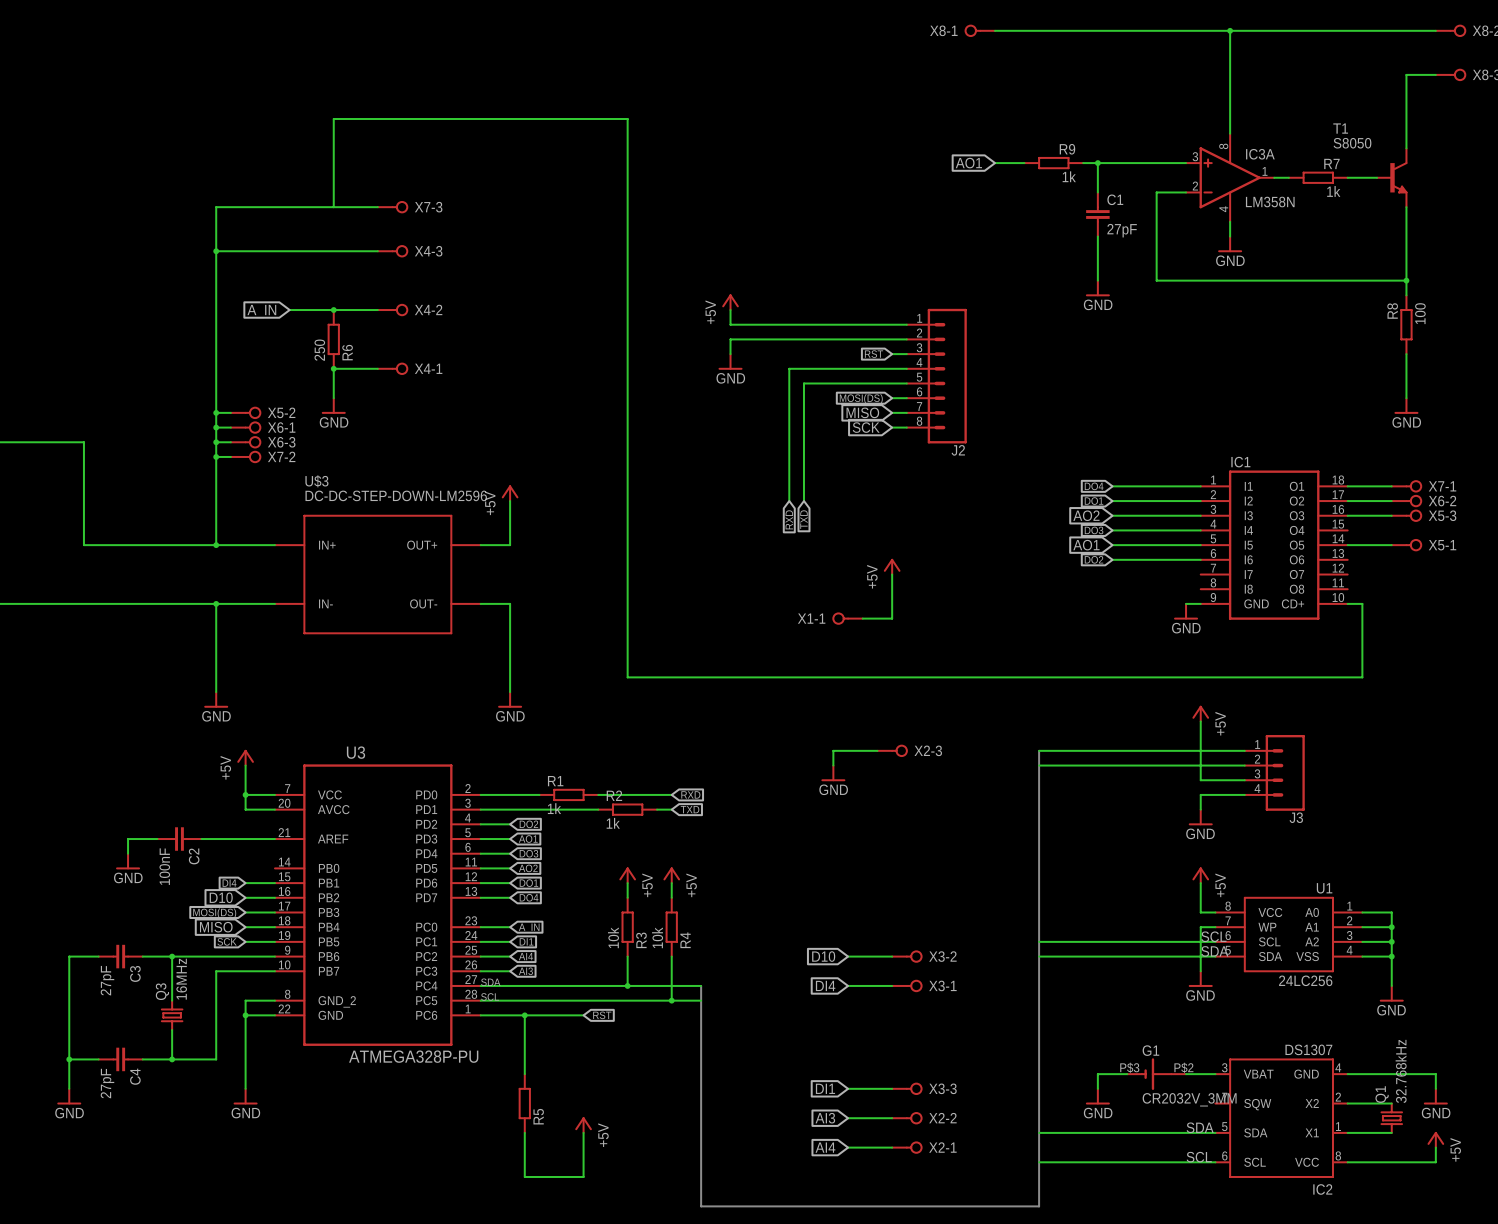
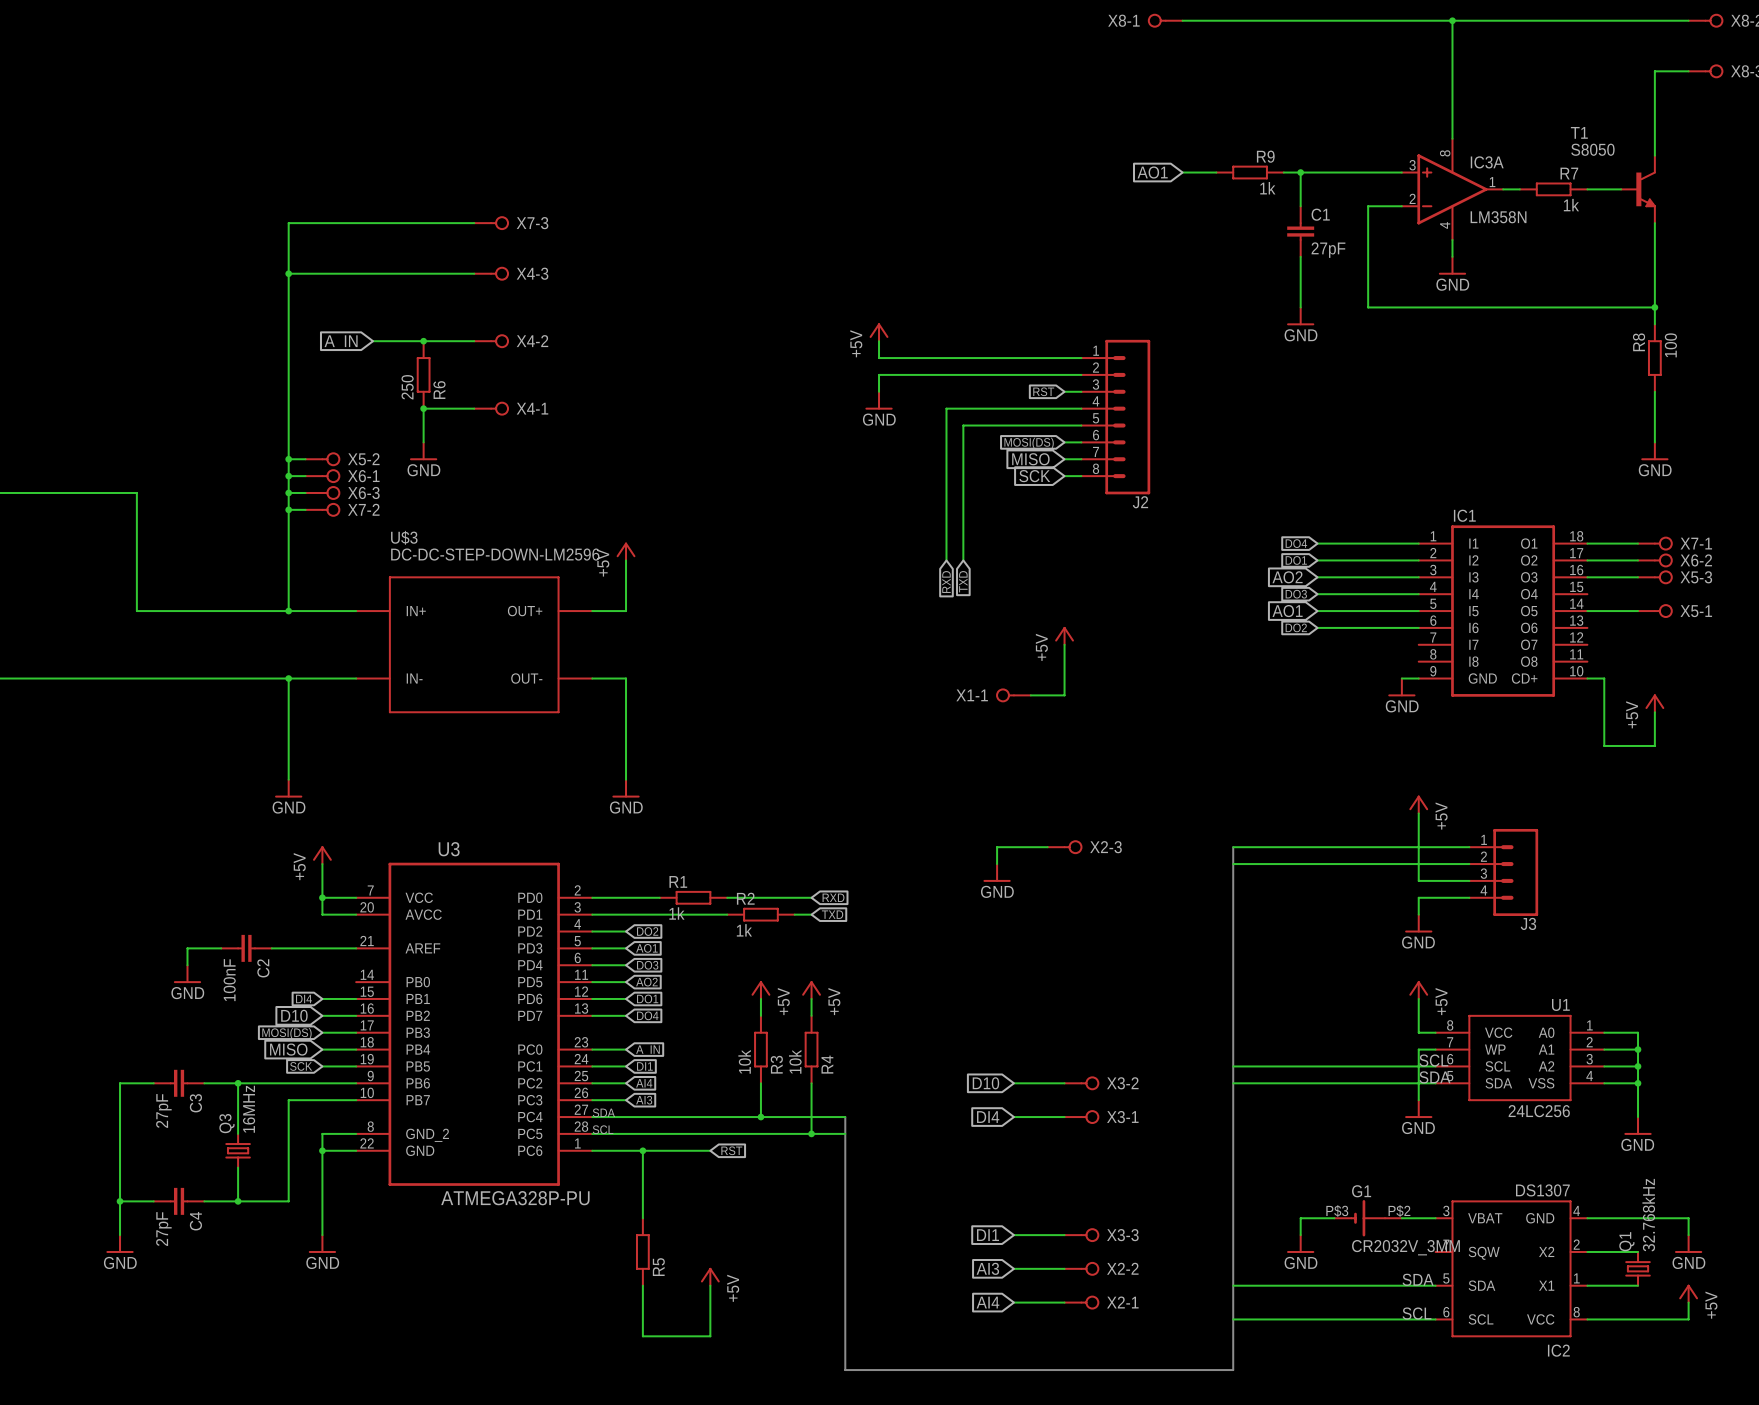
wire: (333, 207) (333, 118) (627, 118) (627, 677) (1362, 677) (1362, 662) -> (1654, 712) (1654, 745) (1604, 745)
power symbol: none -> +5V (1654, 703)

